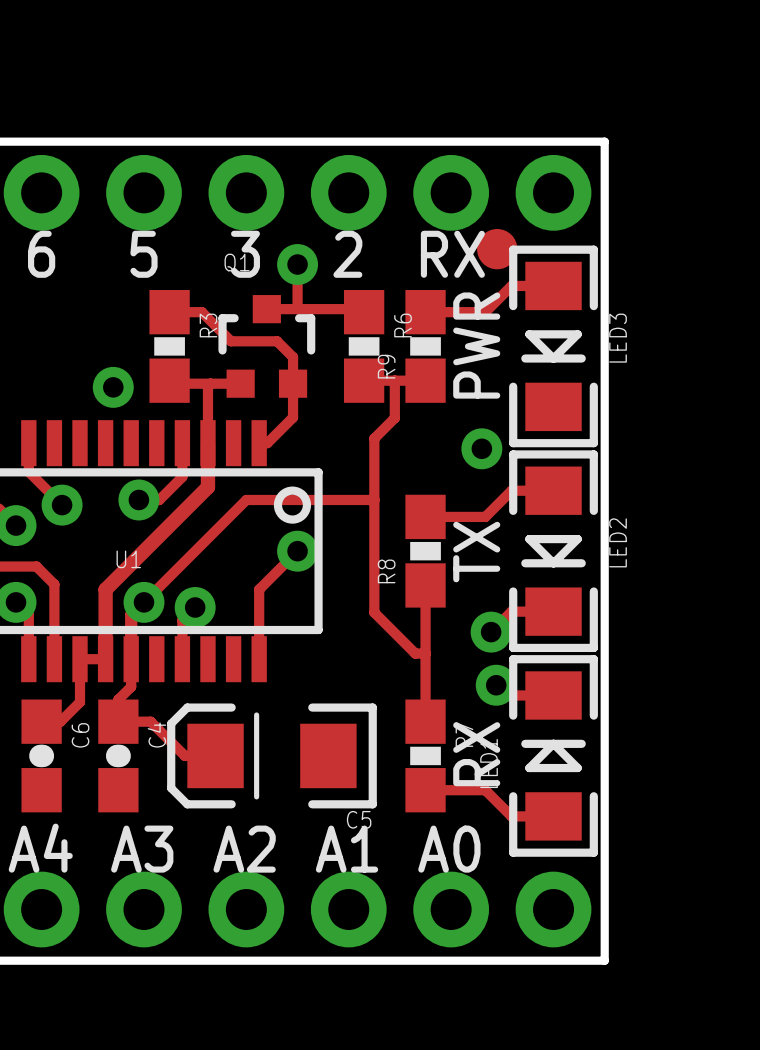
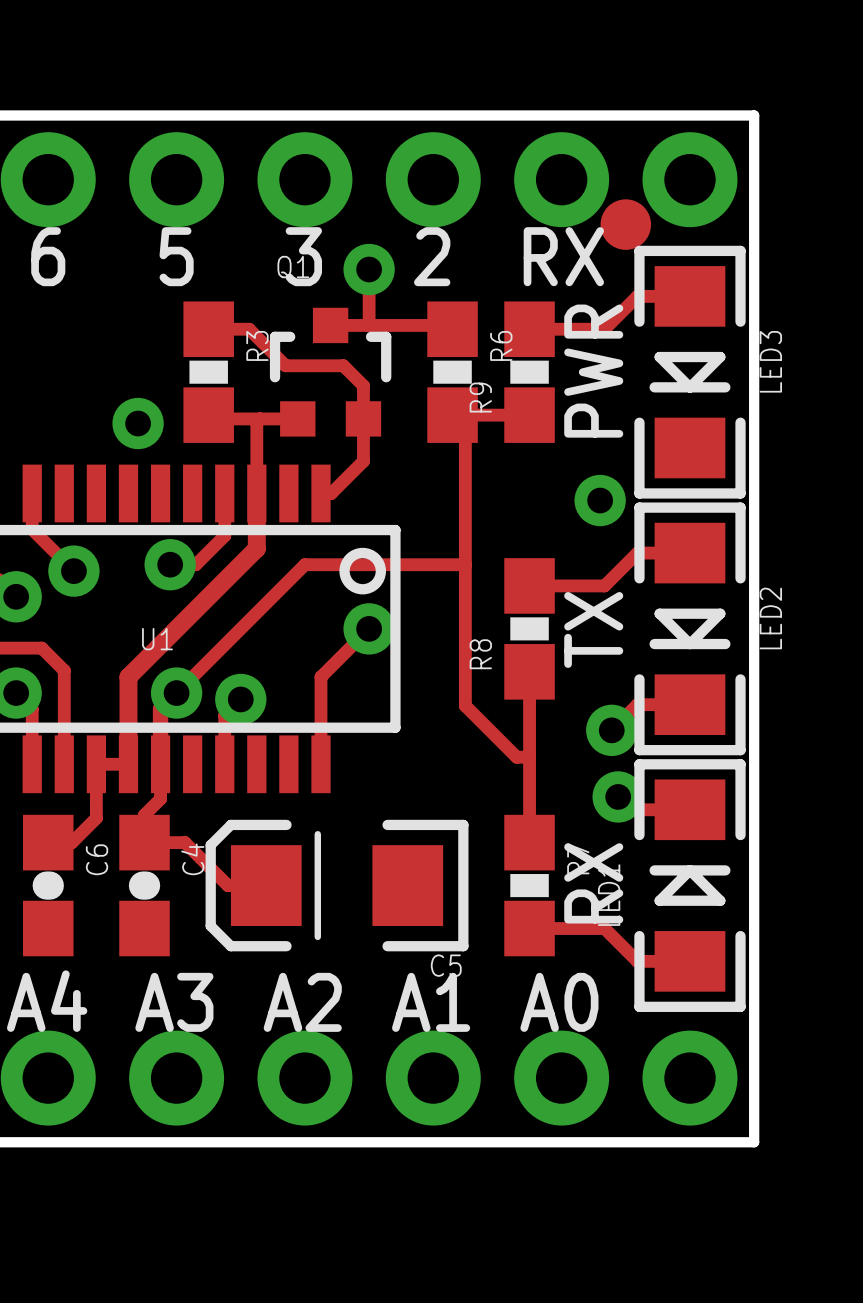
part position: (497, 249) -> (625, 224)
track: (394, 380) (394, 418) (374, 438) -> (465, 415) (465, 487)

